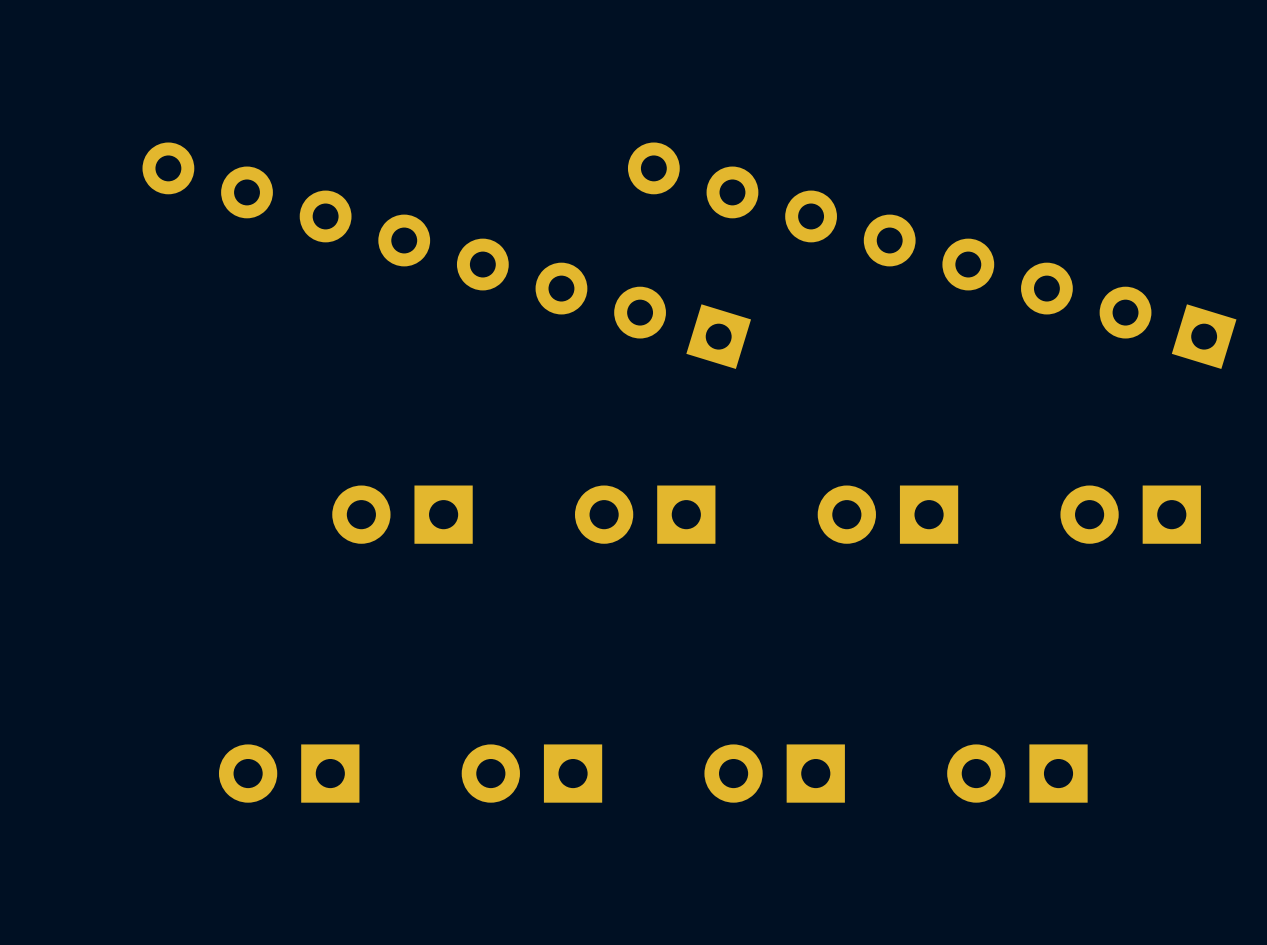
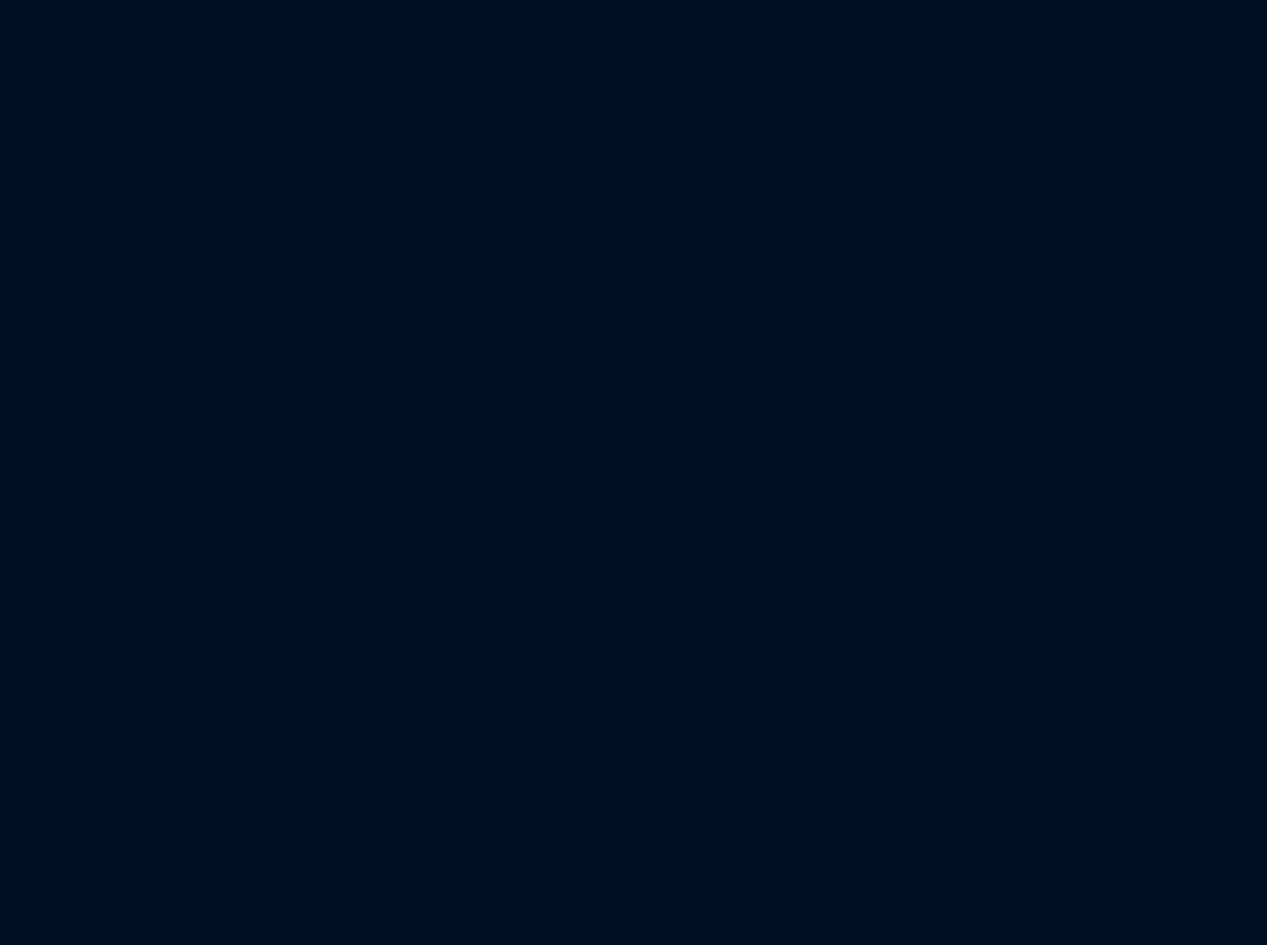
part: (446, 255) -> none
part: (932, 255) -> none
part: (402, 514) -> none
part: (645, 514) -> none
part: (887, 514) -> none
part: (1130, 514) -> none
part: (289, 773) -> none
part: (531, 773) -> none
part: (774, 773) -> none
part: (1017, 773) -> none

